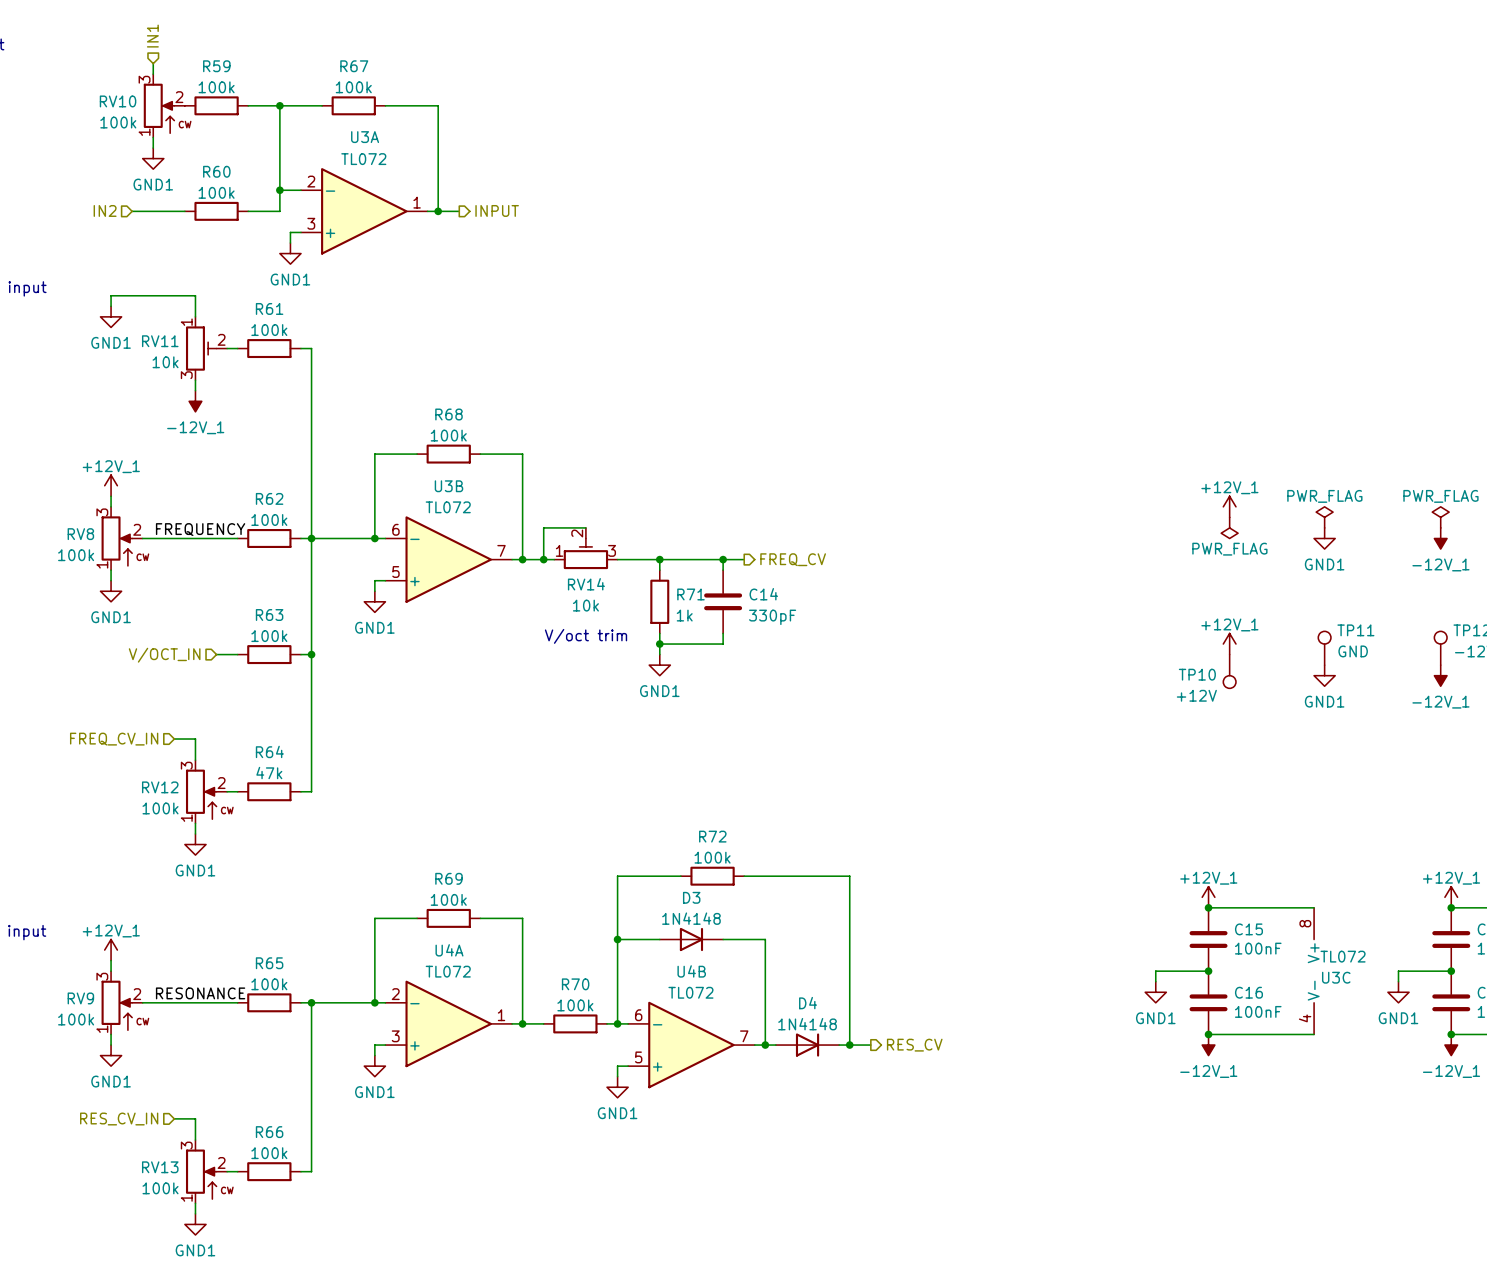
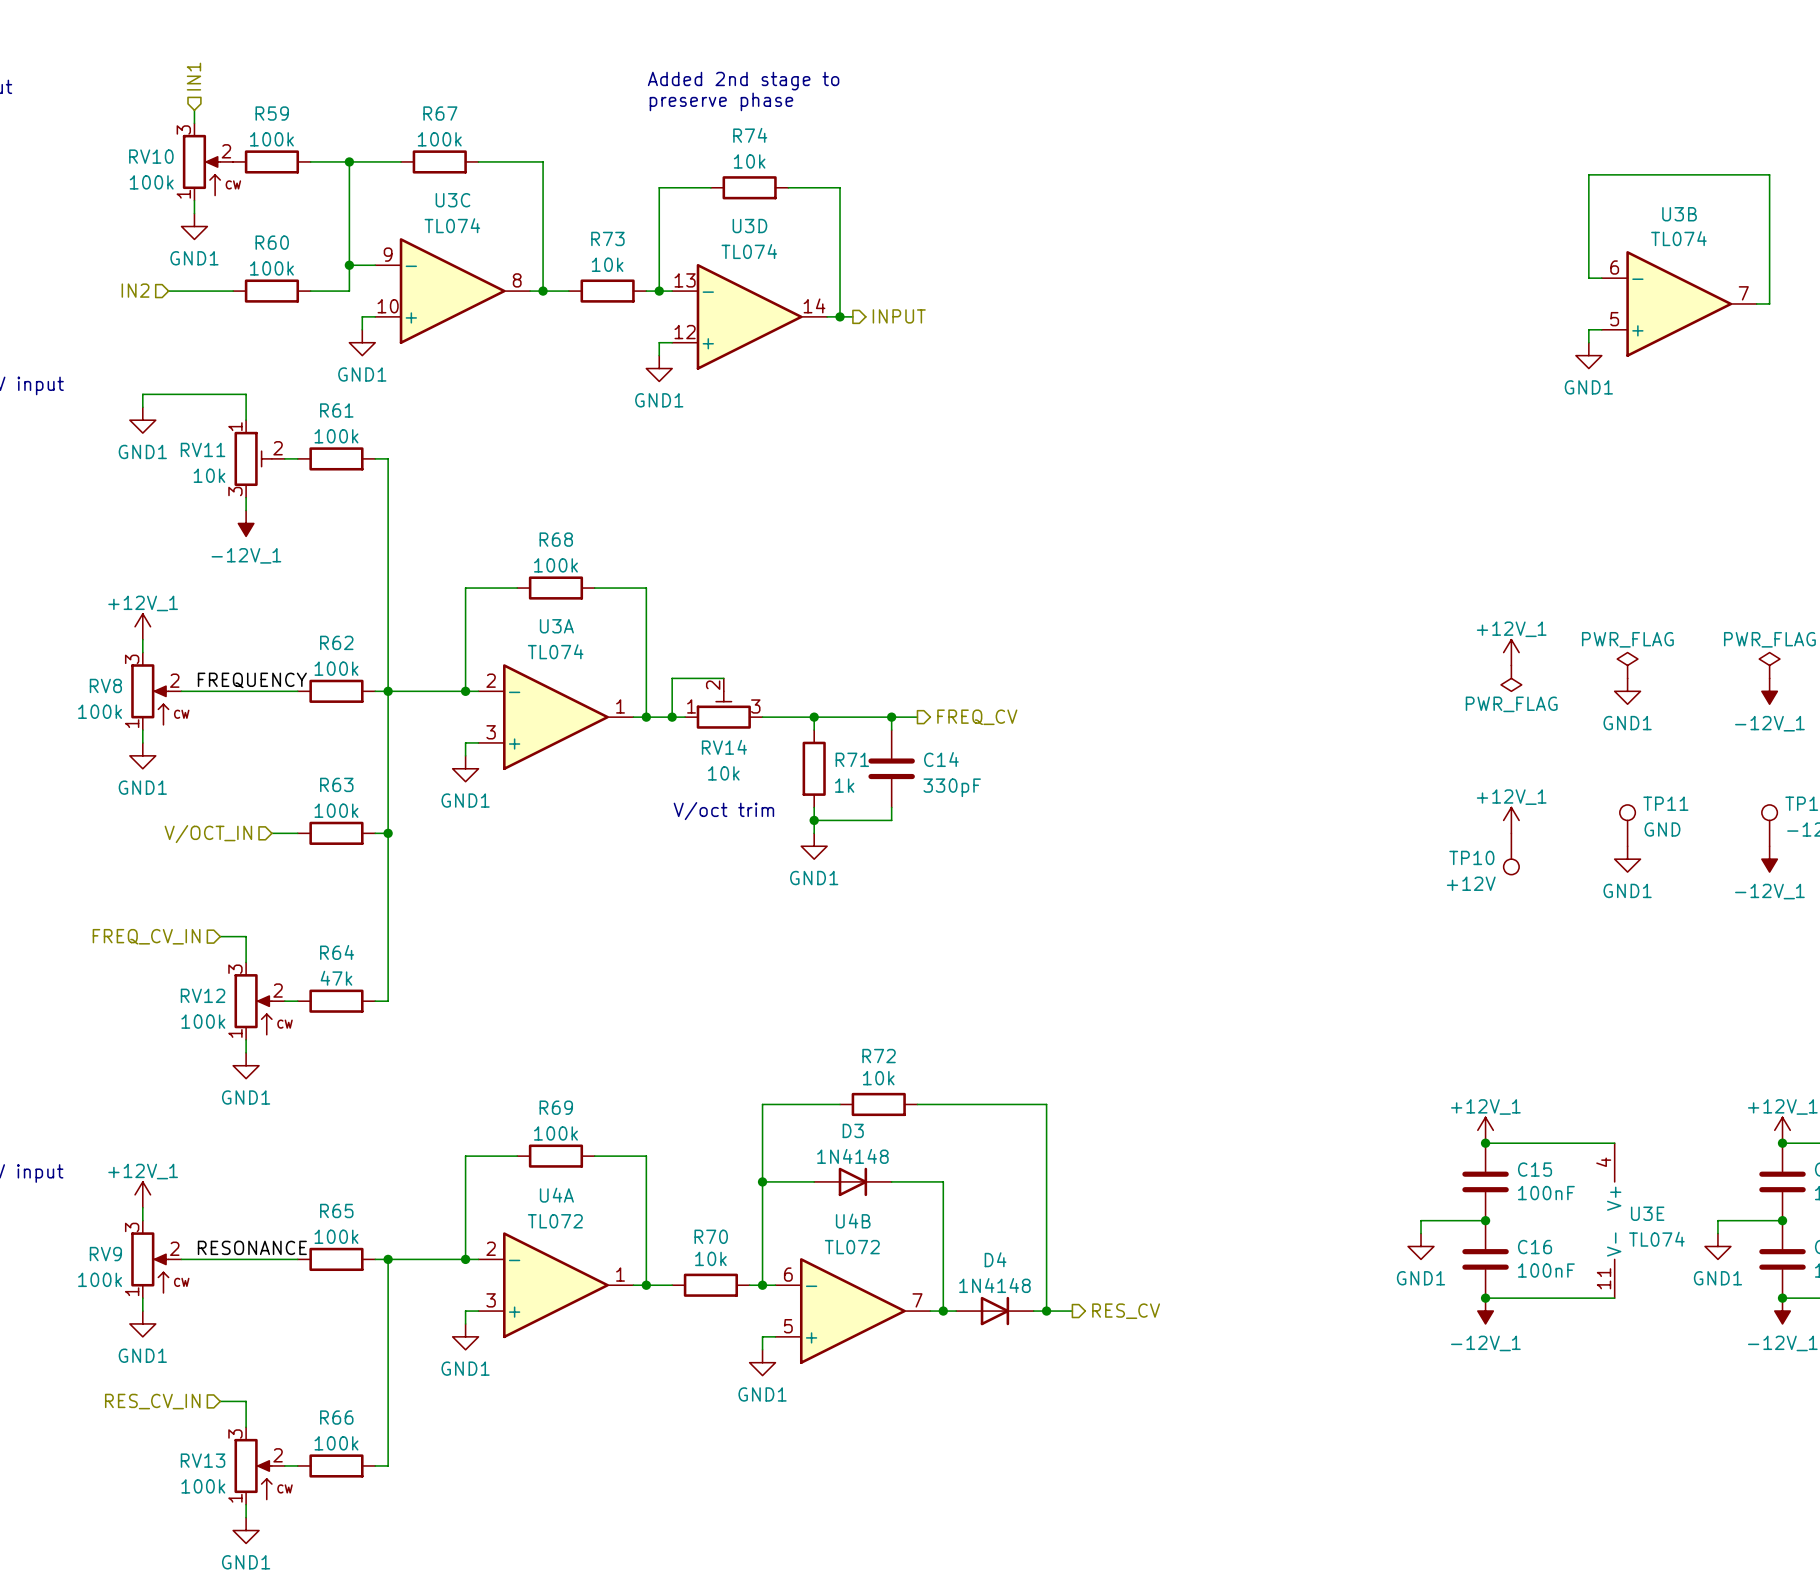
text: none -> Added 2nd stage to (743, 81)
text: none -> preserve phase (721, 101)
wire: none -> (710, 187) (659, 187) (659, 291)
R74: none -> 10k (749, 187)
wire: none -> (788, 187) (840, 187) (840, 316)
U3A value: TL072 (363, 159) -> TL074 (555, 651)
wire: none -> (1601, 278) (1588, 278) (1588, 174) (1769, 174) (1769, 303) (1756, 303)
hierarchical label: INPUT (497, 210) -> none
U3A position: (364, 211) -> (555, 717)
R73: none -> 10k (607, 291)
wire: none -> (646, 291) (672, 291)
junction: none -> (659, 291)
U3D: none -> TL074 (749, 316)
wire: none -> (827, 316) (852, 316)
junction: none -> (840, 316)
hierarchical label: none -> INPUT (899, 316)
wire: none -> (1601, 329) (1588, 329) (1588, 342)
wire: none -> (672, 342) (659, 342) (659, 355)
power symbol: none -> GND1 (1588, 355)
power symbol: none -> GND1 (659, 368)
U3B value: TL072 (448, 507) -> TL074 (1678, 238)
U3B position: (448, 559) -> (1679, 303)
R72 value: 100k (712, 857) -> 10k (878, 1078)
U3C symbol: [1314, 907, 1315, 1035] -> [375, 238, 531, 345]
U3C value: TL072 (1343, 956) -> TL074 (452, 225)
U3E: none -> TL074 (1614, 1220)
U3C name position: U3C (1336, 977) -> U3C (452, 200)
R70 value: 100k (575, 1005) -> 10k (710, 1258)

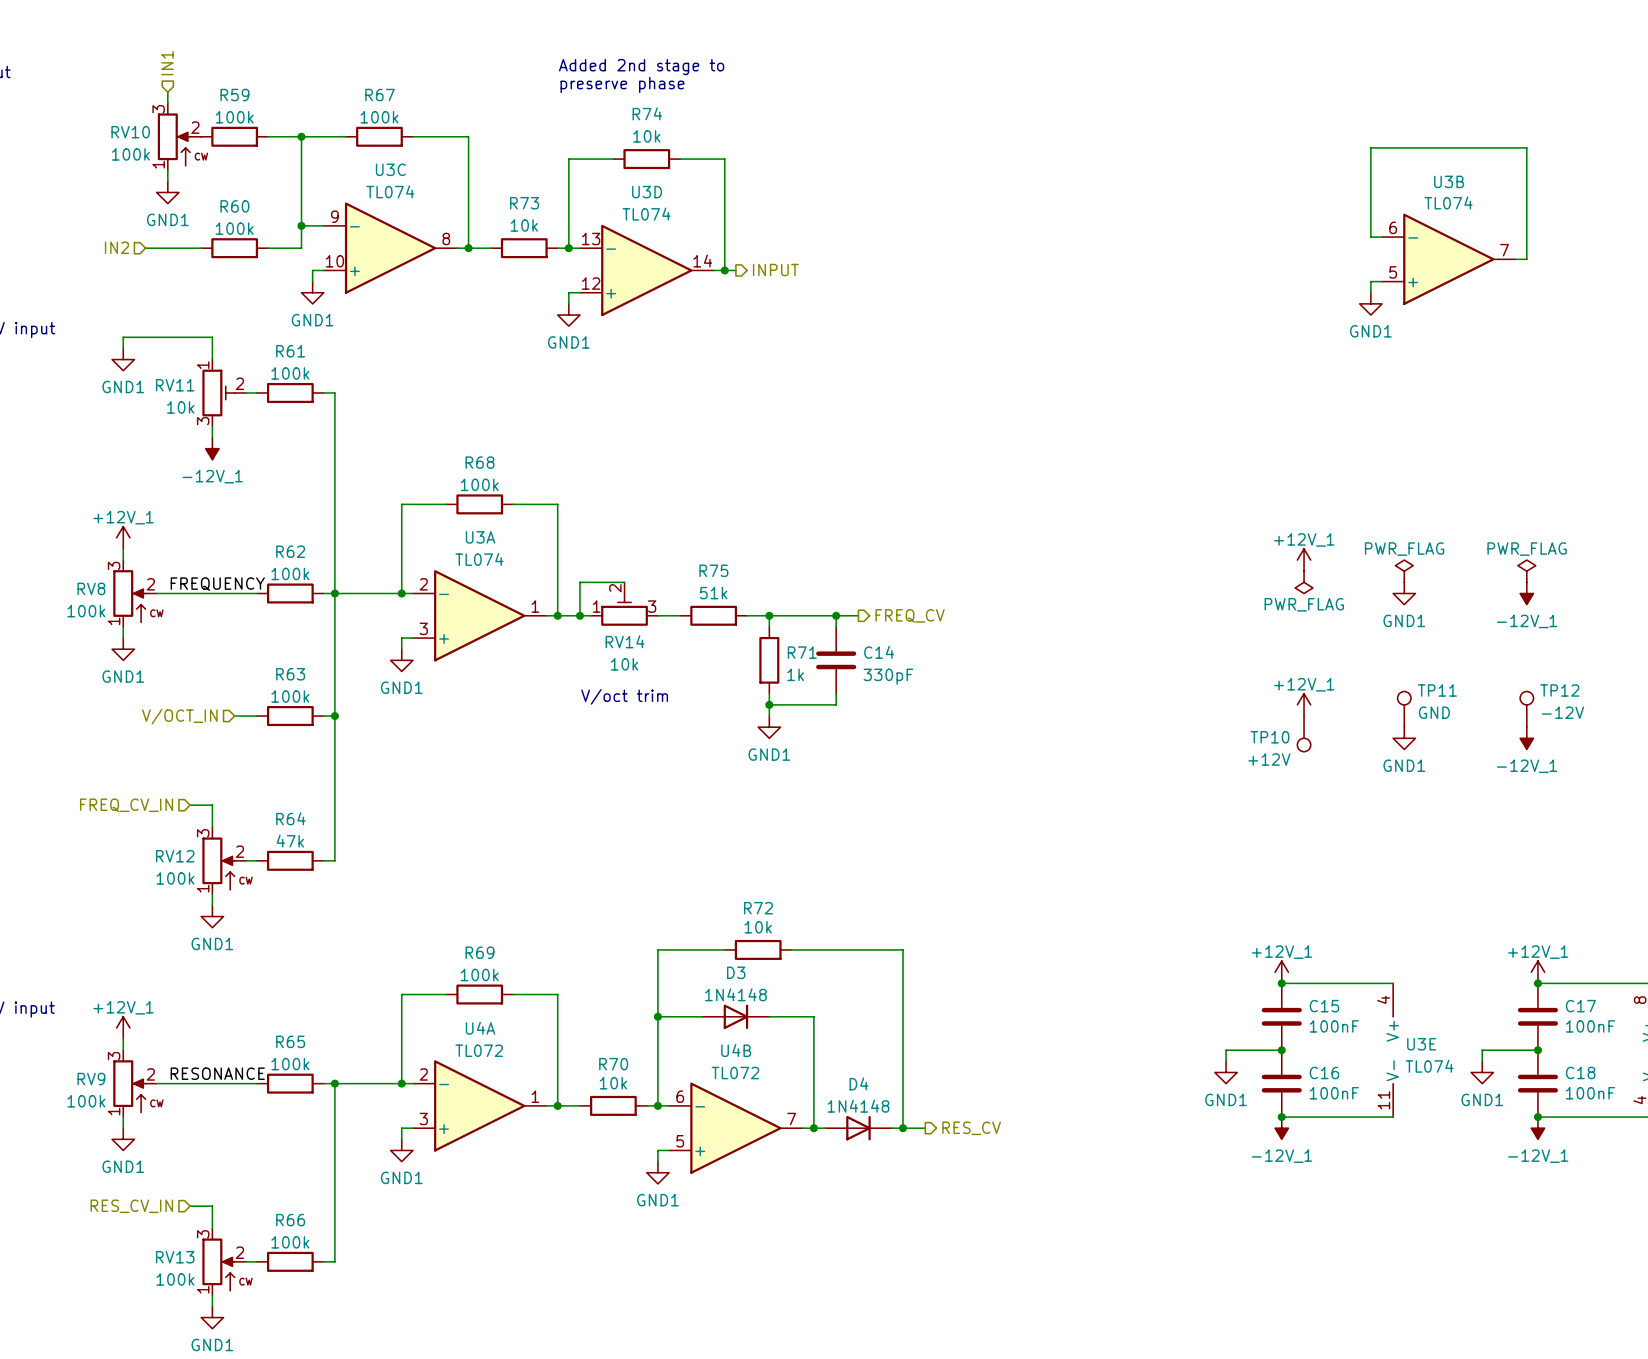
wire: (788, 717) (865, 717) -> (791, 615) (858, 615)
wire: (814, 717) (814, 730) -> (836, 615) (836, 626)
junction: (814, 717) -> none
R75: none -> 51k (713, 615)
junction: none -> (836, 615)
hierarchical label position: FREQ_CV (977, 717) -> FREQ_CV (910, 615)
R71 position: (814, 768) -> (769, 660)
C14 position: (891, 768) -> (836, 660)
wire: (814, 807) (814, 833) -> none
wire: none -> (836, 693) (836, 704) (769, 704) (769, 716)
wire: (814, 820) (891, 820) -> none
junction: (814, 820) -> none
junction: none -> (769, 704)
power symbol position: GND1 (814, 846) -> GND1 (769, 727)

